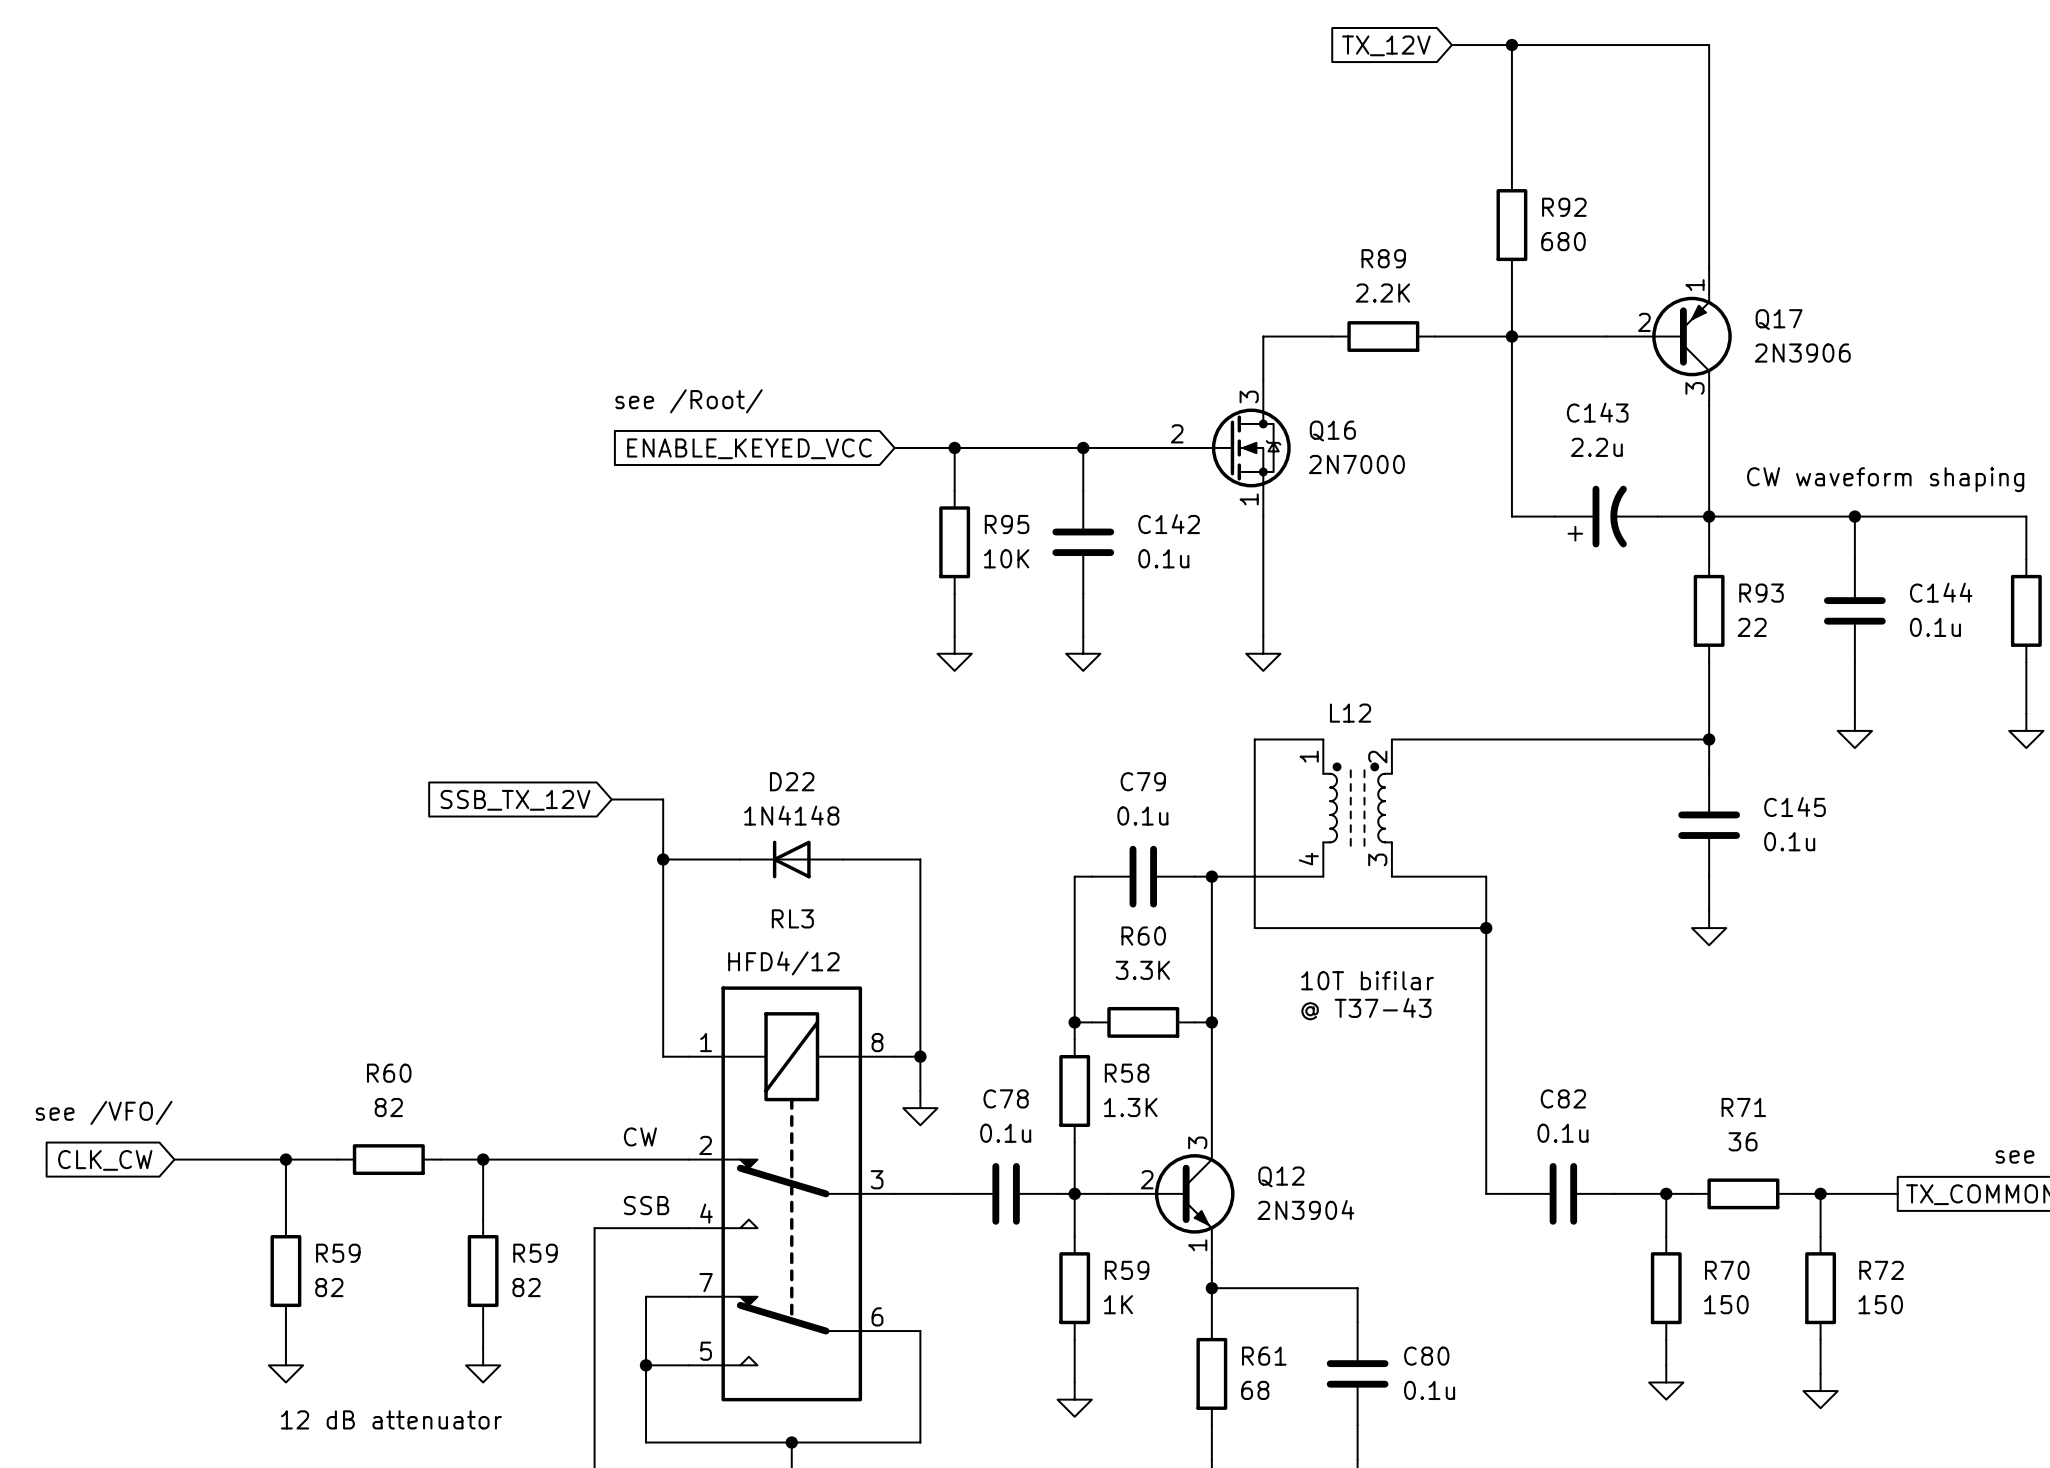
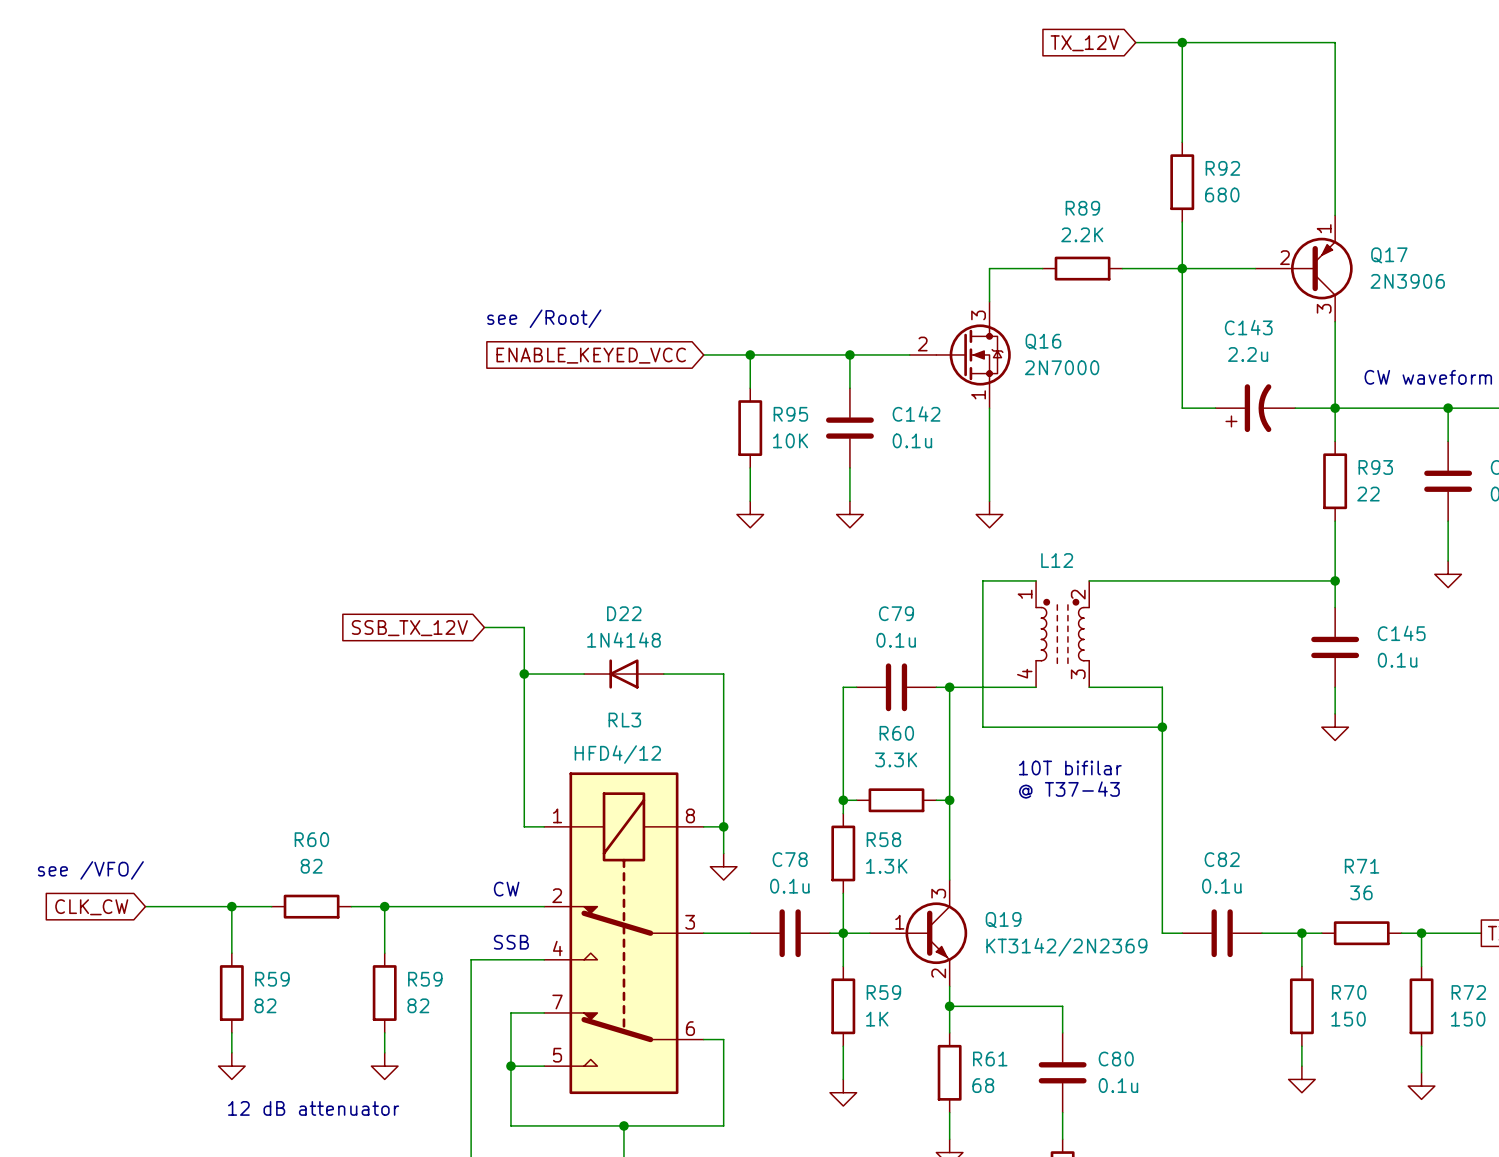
Q12 name: Q12 (1281, 1176) -> Q19 (1003, 920)
Q12 pin number: 2 (1147, 1179) -> 1 (899, 922)
Q12 value: 2N3904 (1305, 1209) -> KT3142/2N2369 (1066, 947)
Q12 pin number: 1 (1197, 1245) -> 2 (938, 973)

